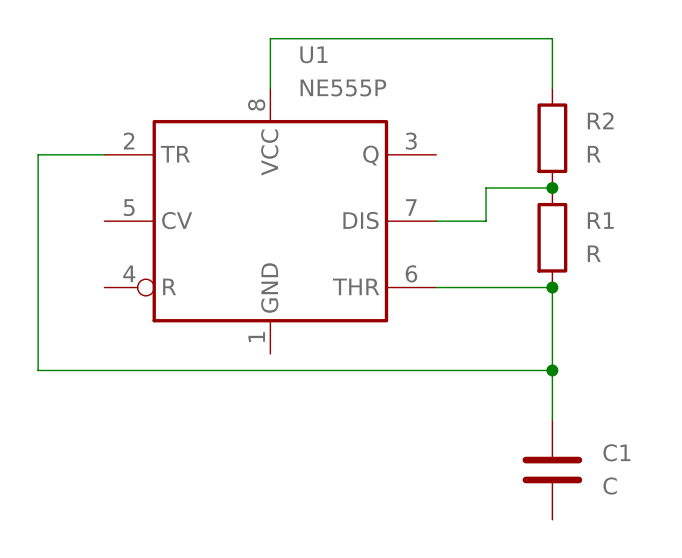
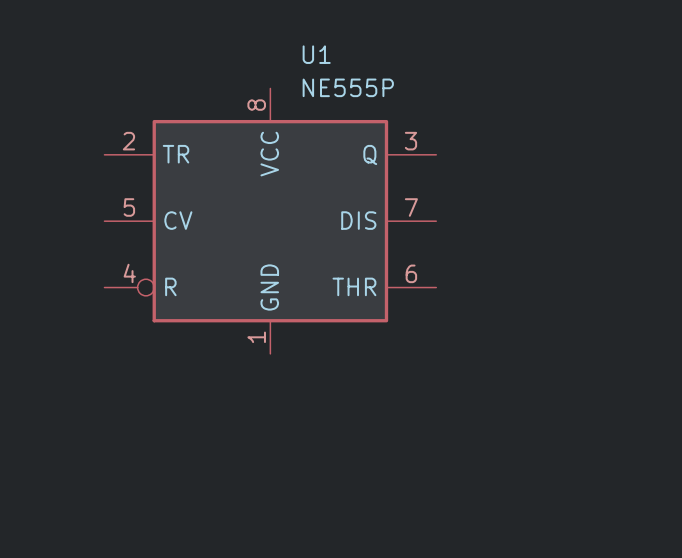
wire: (270, 88) (270, 38) (552, 38) (552, 88) -> none
R2: R (552, 138) -> none
wire: (104, 154) (38, 154) (38, 370) (552, 370) -> none
wire: (552, 188) (486, 188) (486, 221) (436, 221) -> none
junction: (552, 188) -> none
R1: R (552, 237) -> none
wire: (436, 287) (552, 287) (552, 420) -> none
junction: (552, 287) -> none
junction: (552, 370) -> none
C1: C (552, 470) -> none

